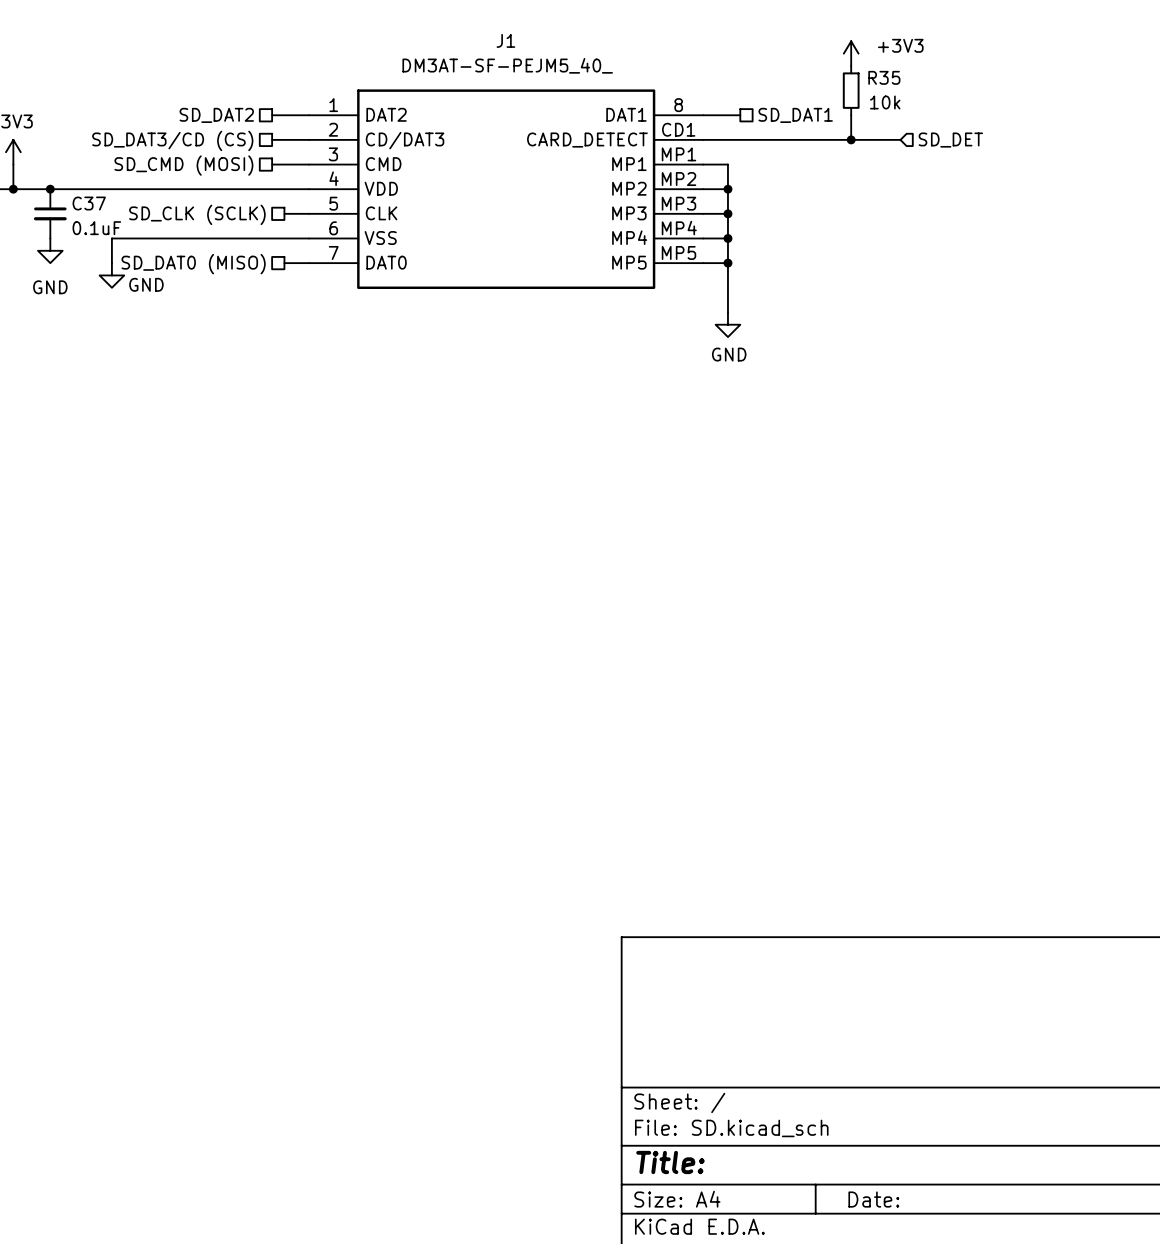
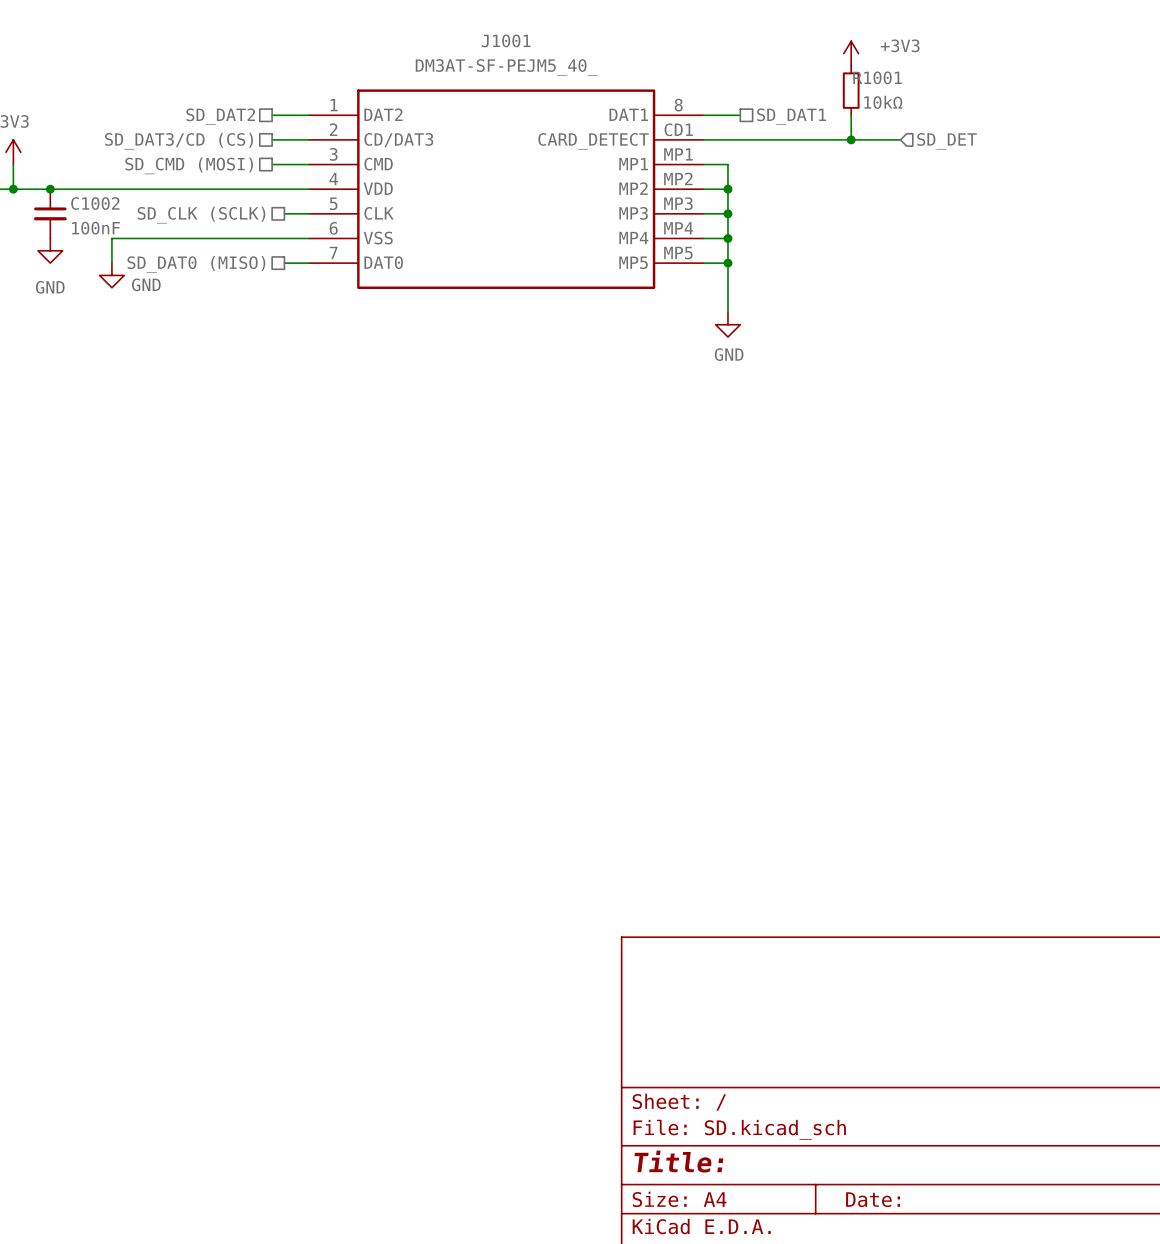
J1 name: J1 (505, 40) -> J1001 (506, 40)
R35 name: R35 (884, 77) -> R1001 (877, 77)
R35 value: 10k (885, 102) -> 10kΩ (883, 102)
C37 name: C37 (89, 203) -> C1002 (95, 203)
C37 value: 0.1uF (96, 228) -> 100nF (96, 228)

